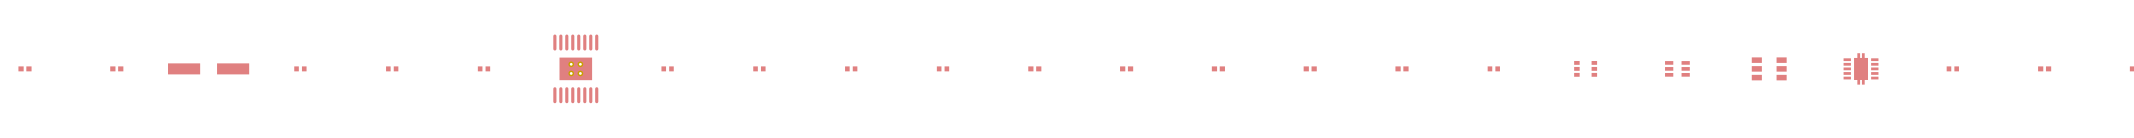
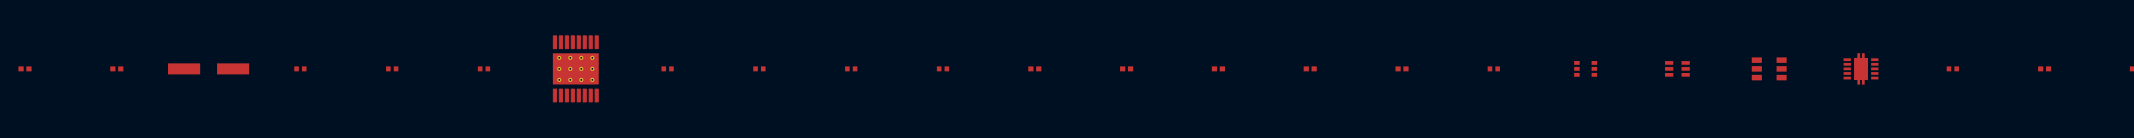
part footprint: [553, 34, 599, 104] -> [552, 35, 599, 103]

